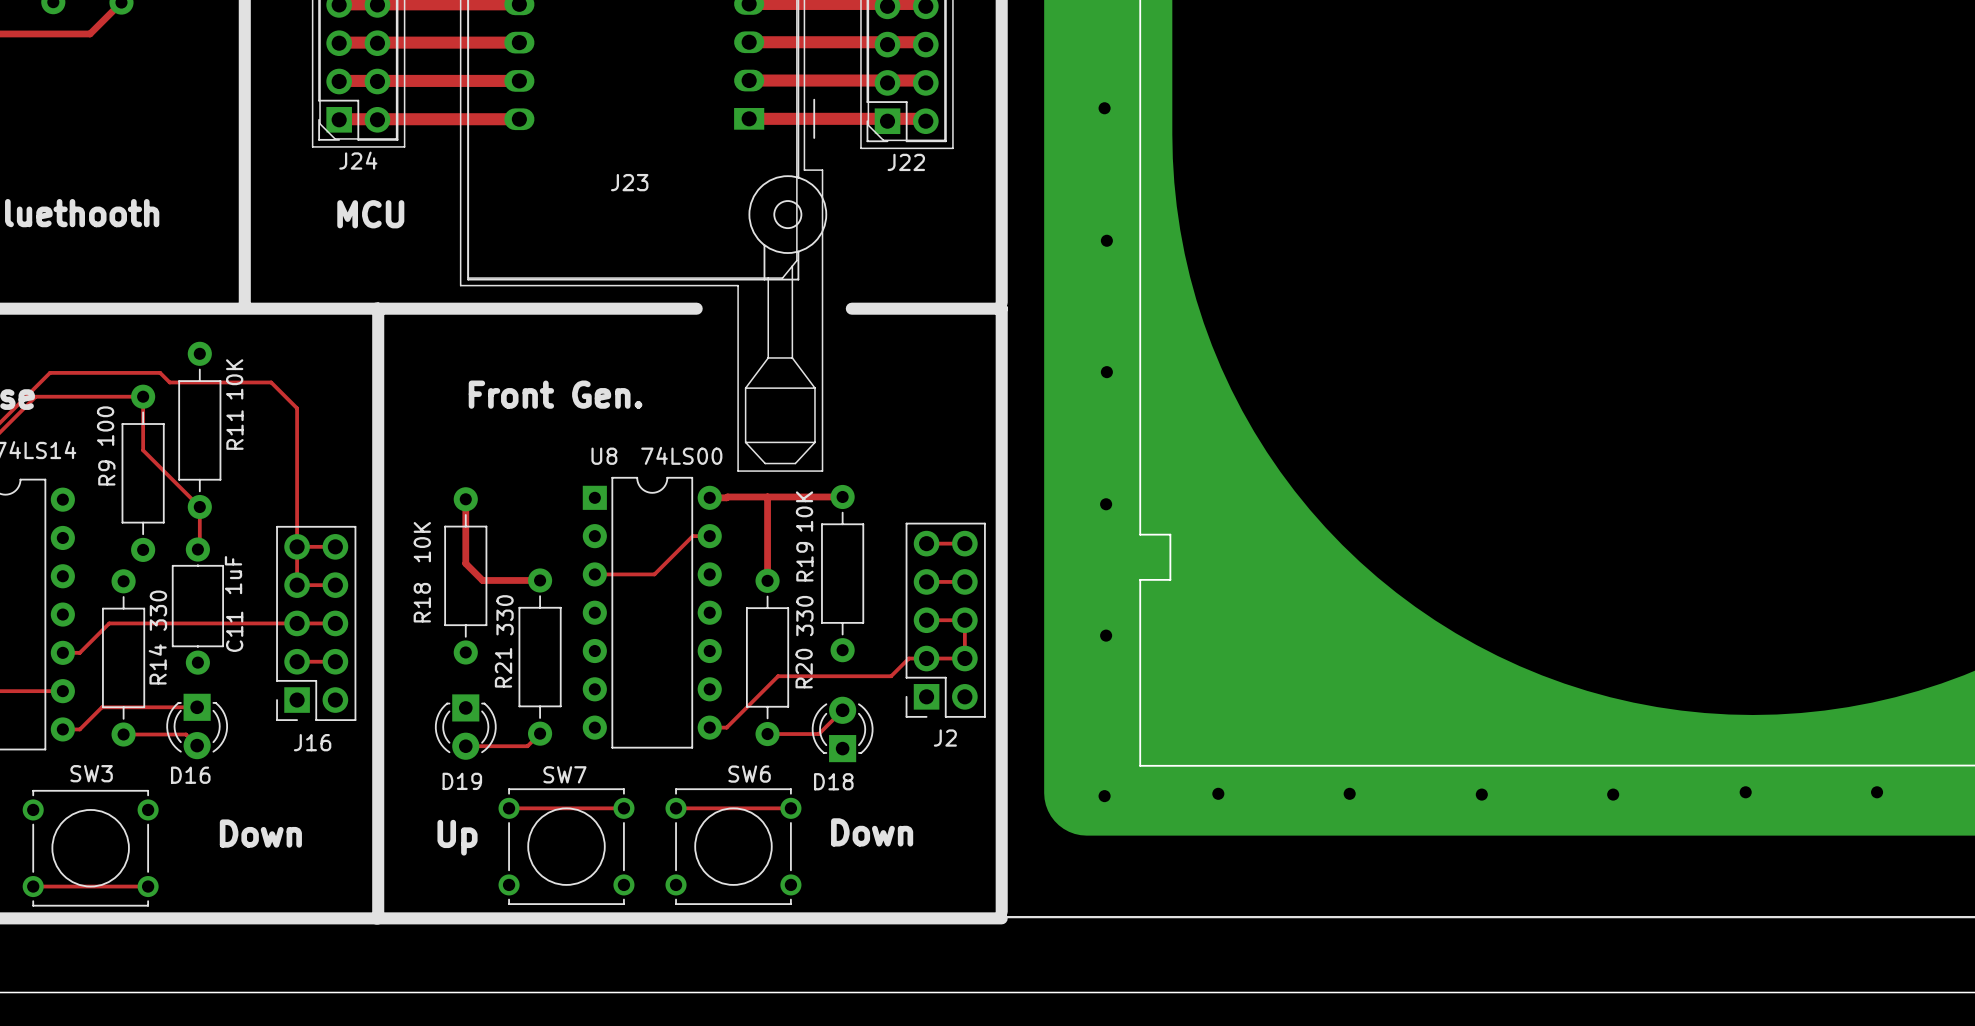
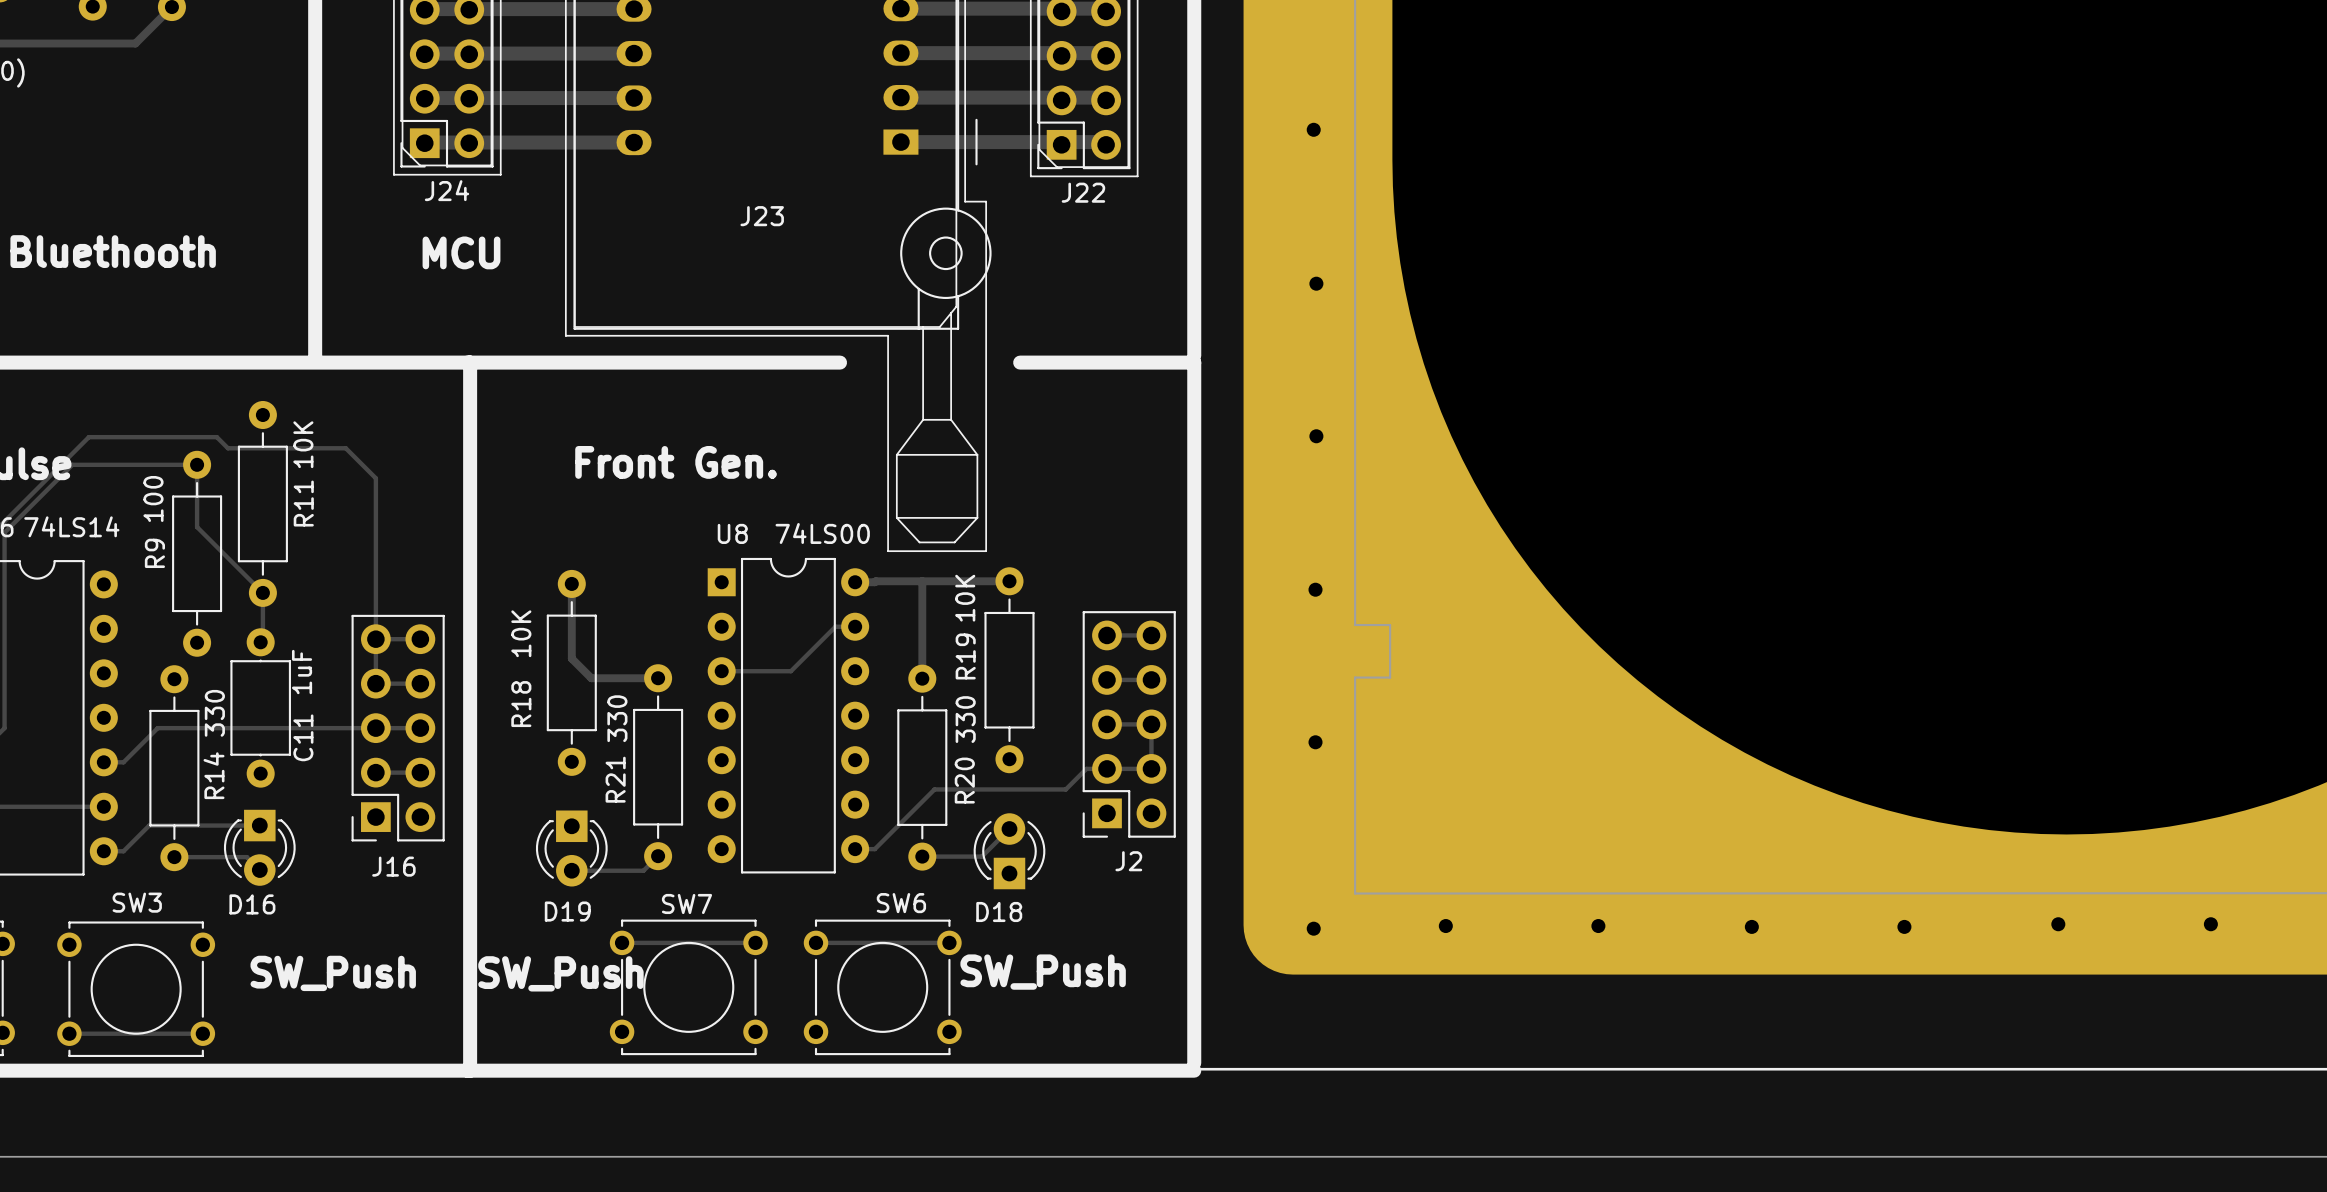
SW6 value: Down (872, 832) -> SW_Push (1043, 972)
SW3 value: Down (260, 833) -> SW_Push (333, 973)
SW7 value: Up (457, 837) -> SW_Push (560, 973)

